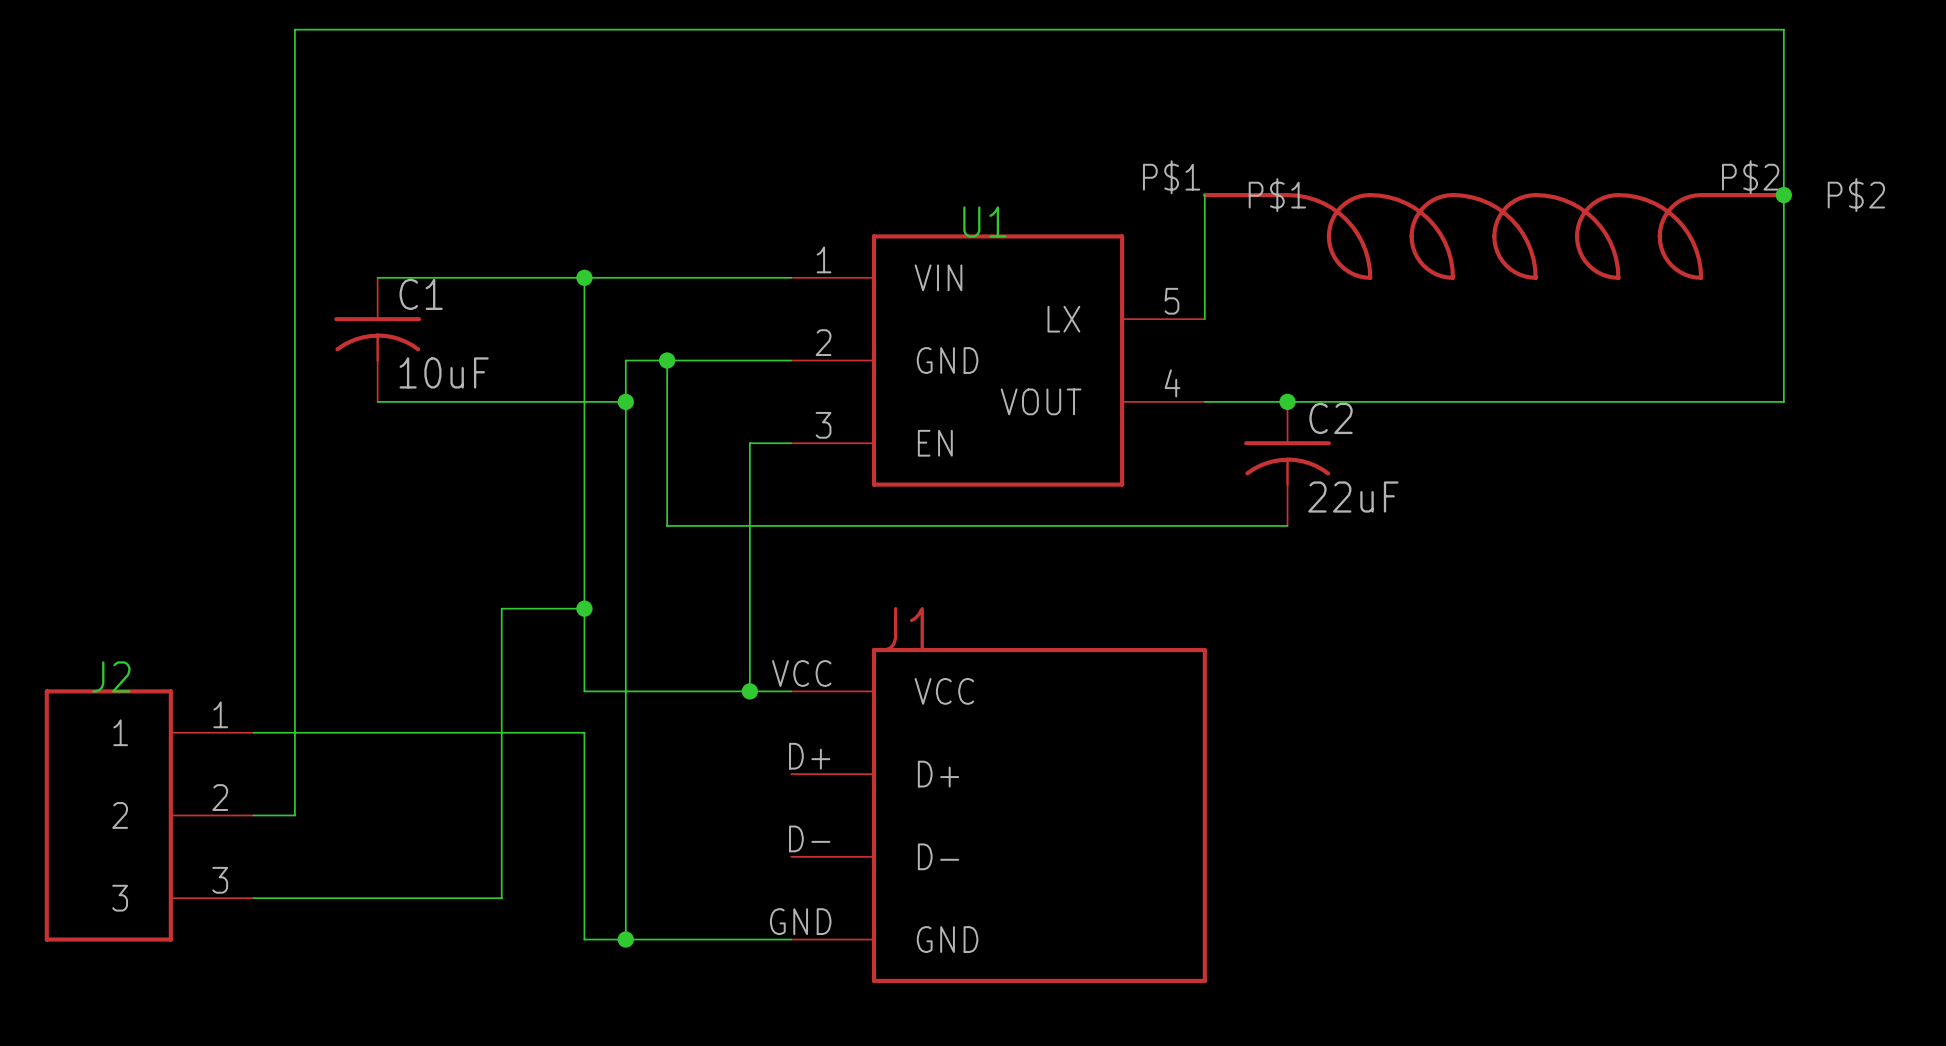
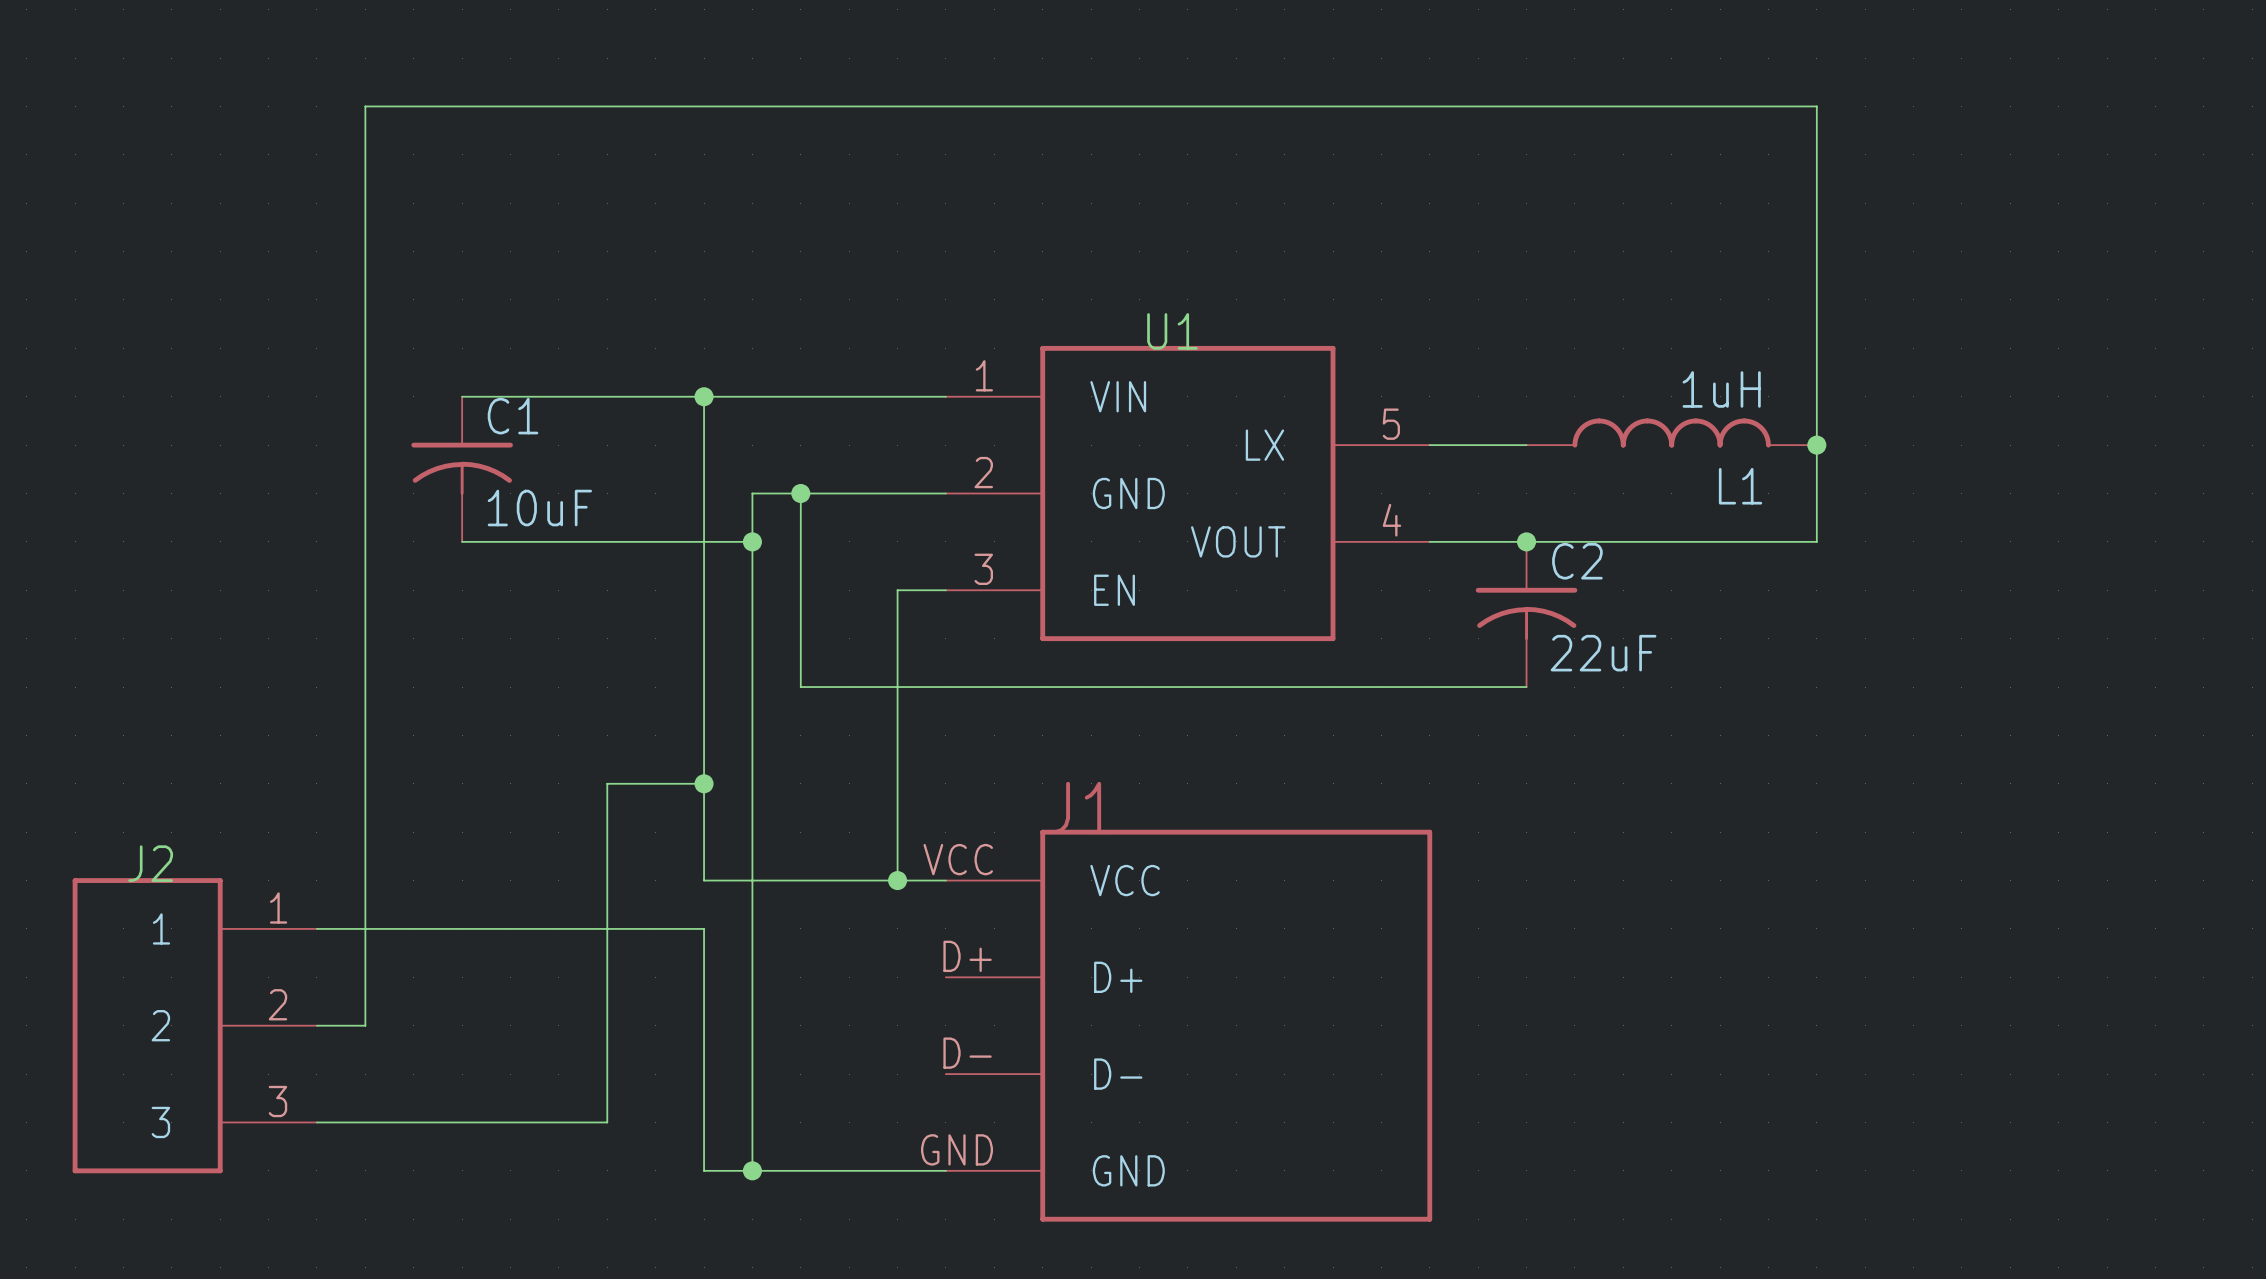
wire: (1535, 29) (1783, 29) (1783, 401) (1535, 401) -> (1816, 106) (1816, 541)
wire: (1204, 195) (1204, 319) -> (1526, 445) (1429, 445)
junction: (1783, 195) -> none
part: (1494, 236) -> none
L1: none -> 1uH (1671, 433)
junction: none -> (1816, 445)

